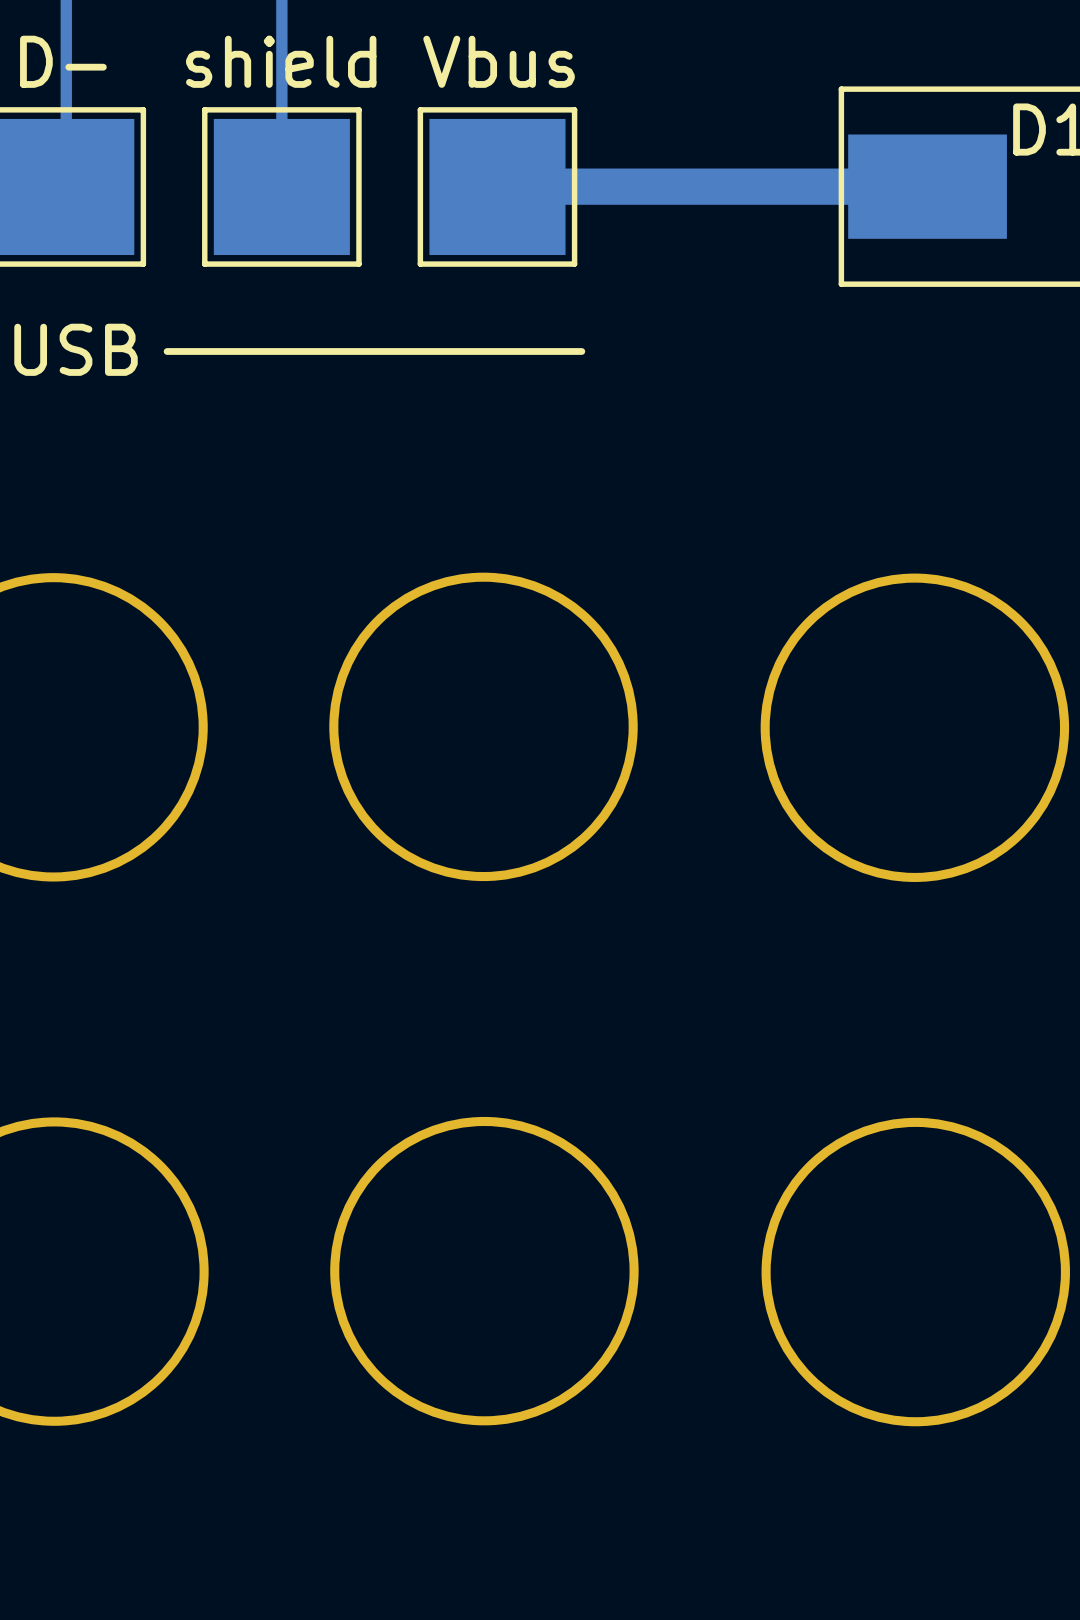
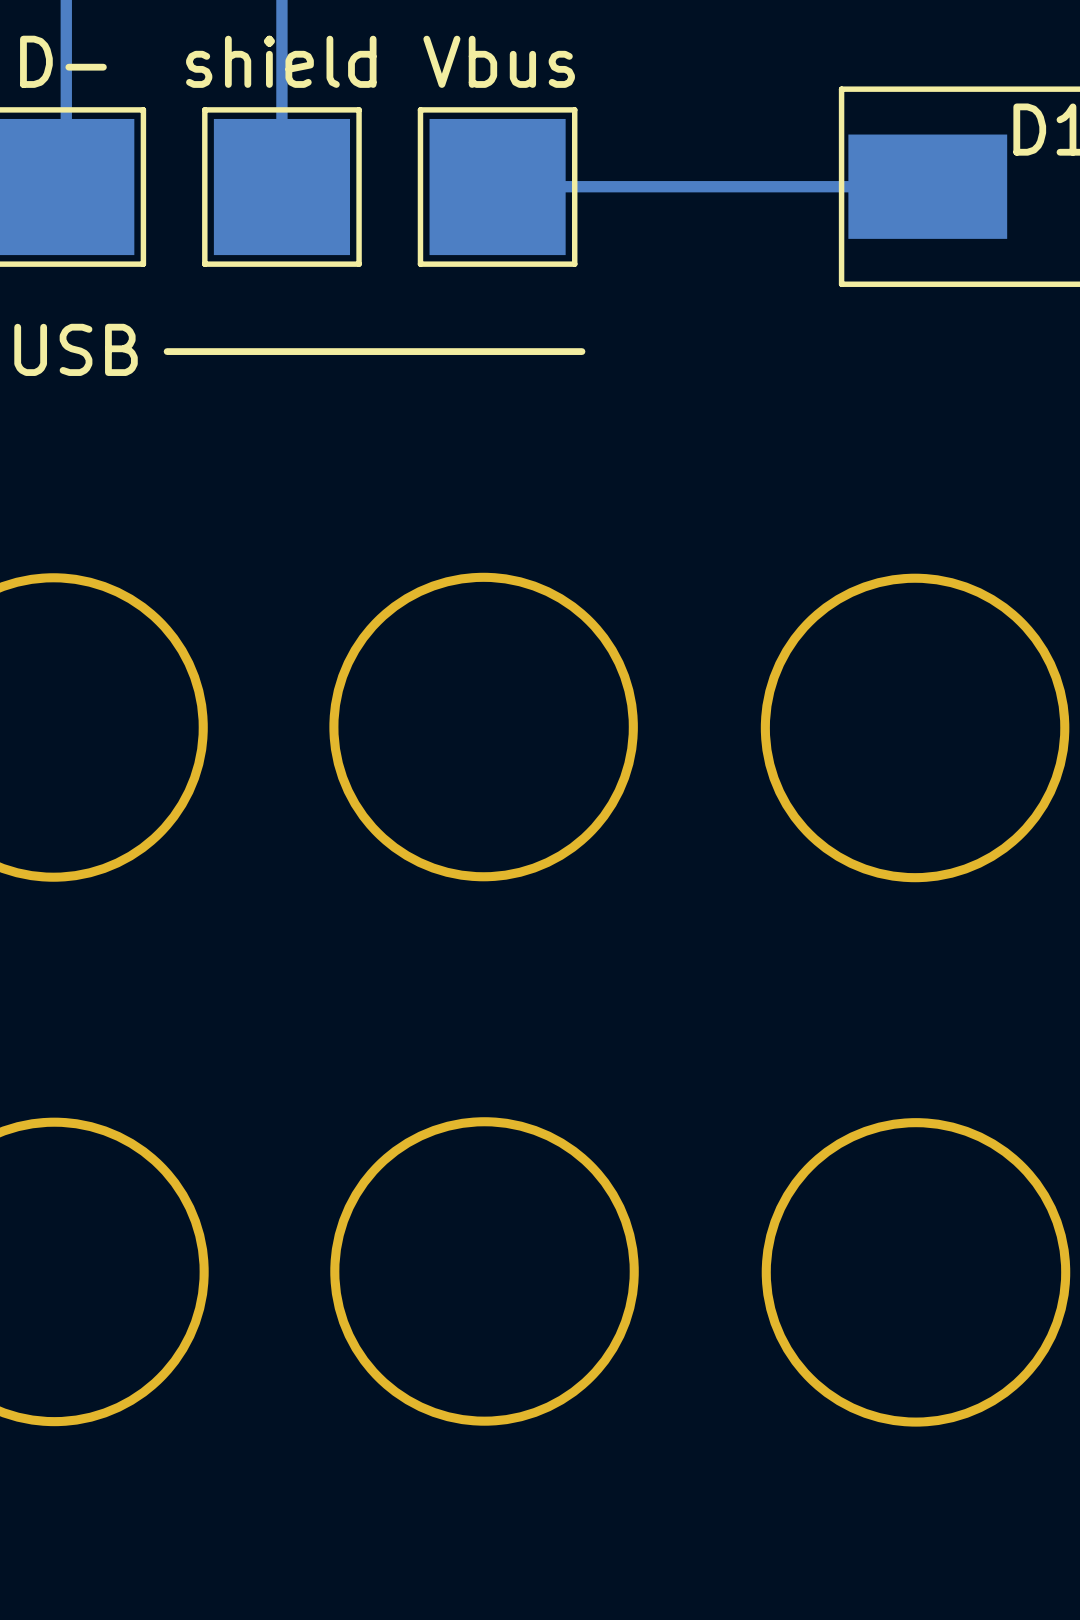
track width: thick (927, 186) (497, 186) -> thin (927, 186) (497, 186)

